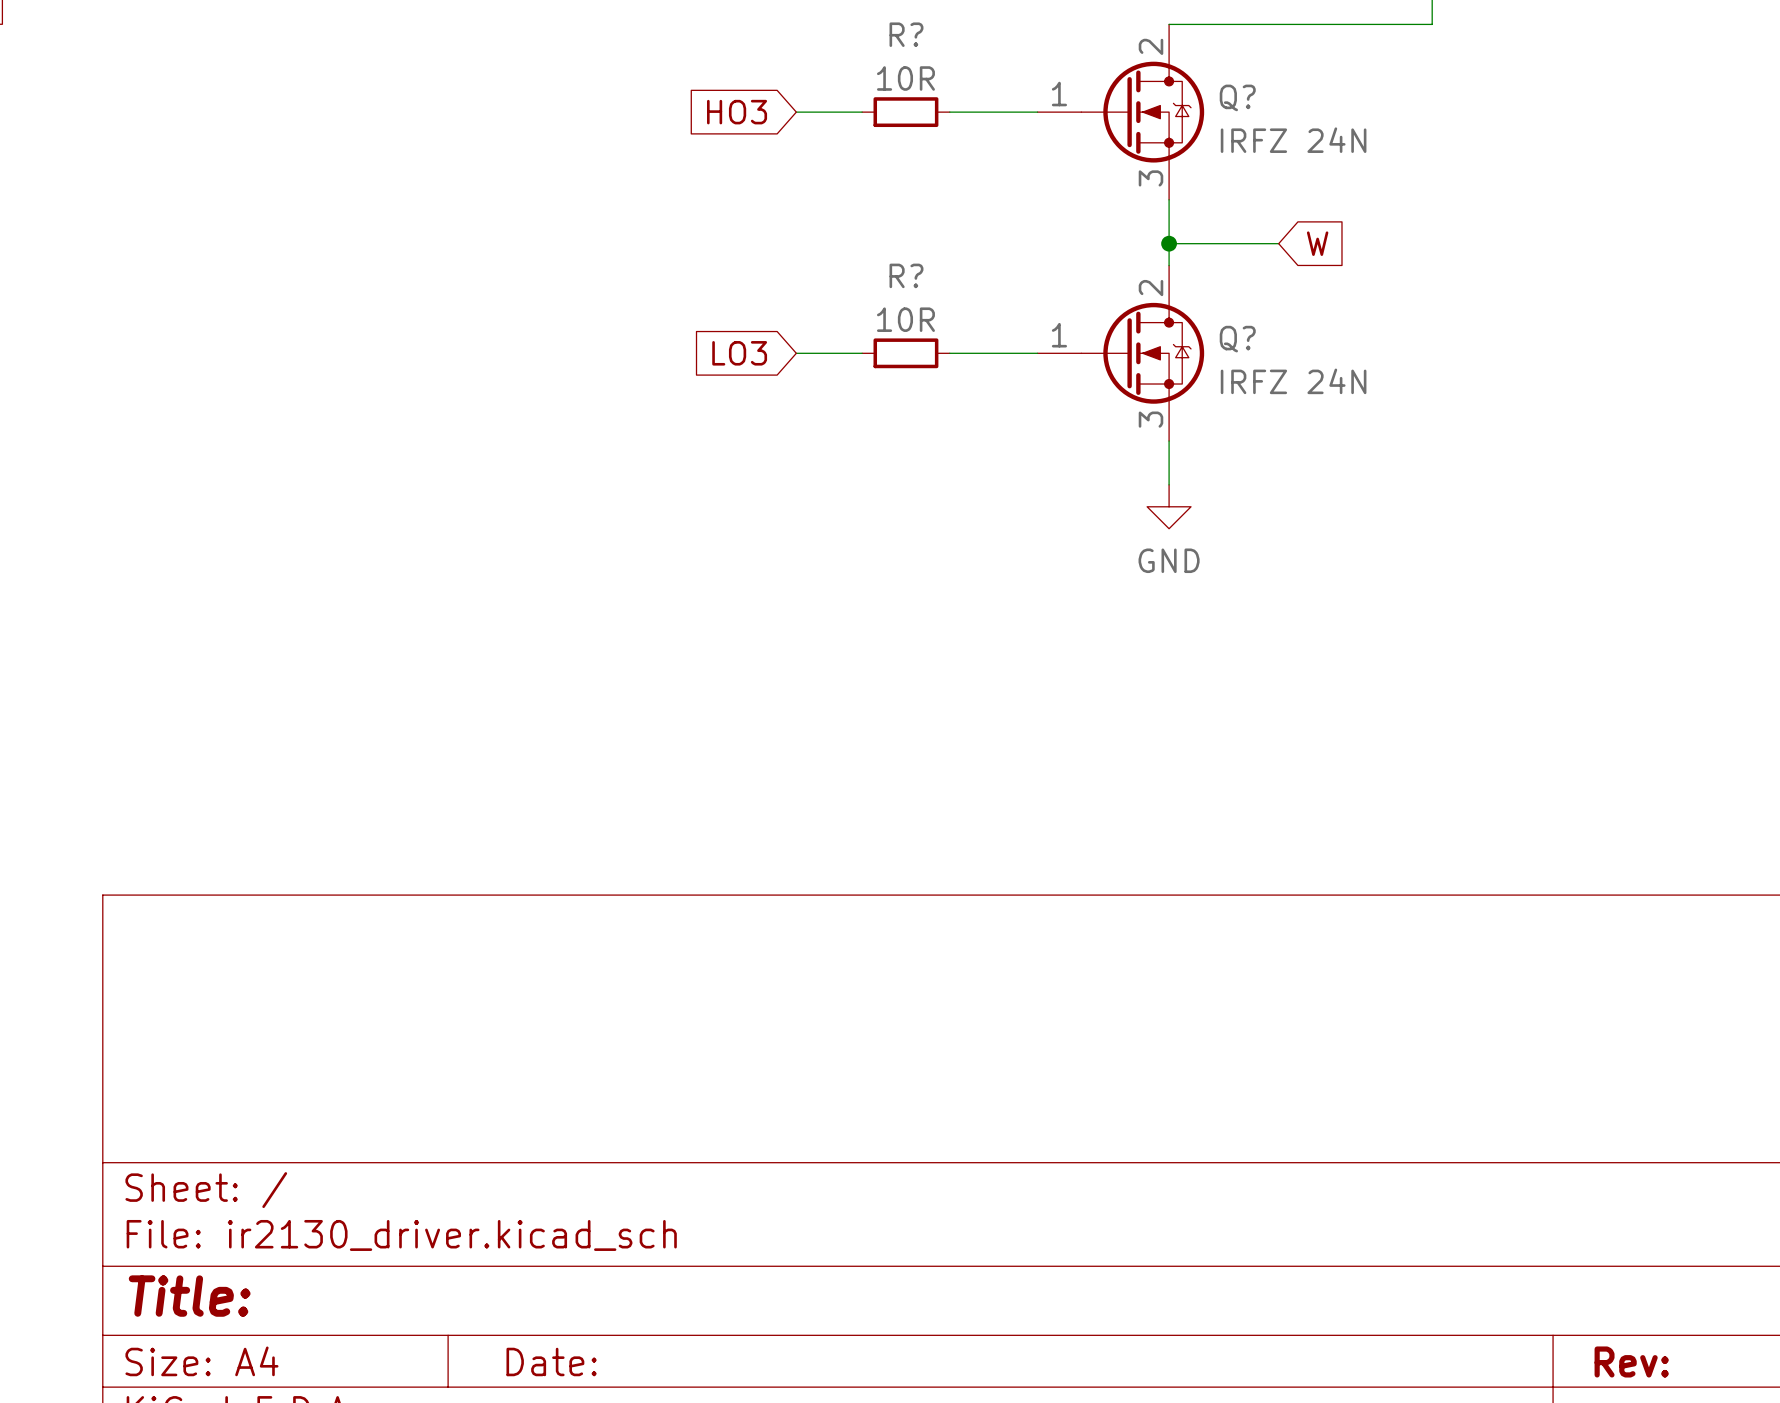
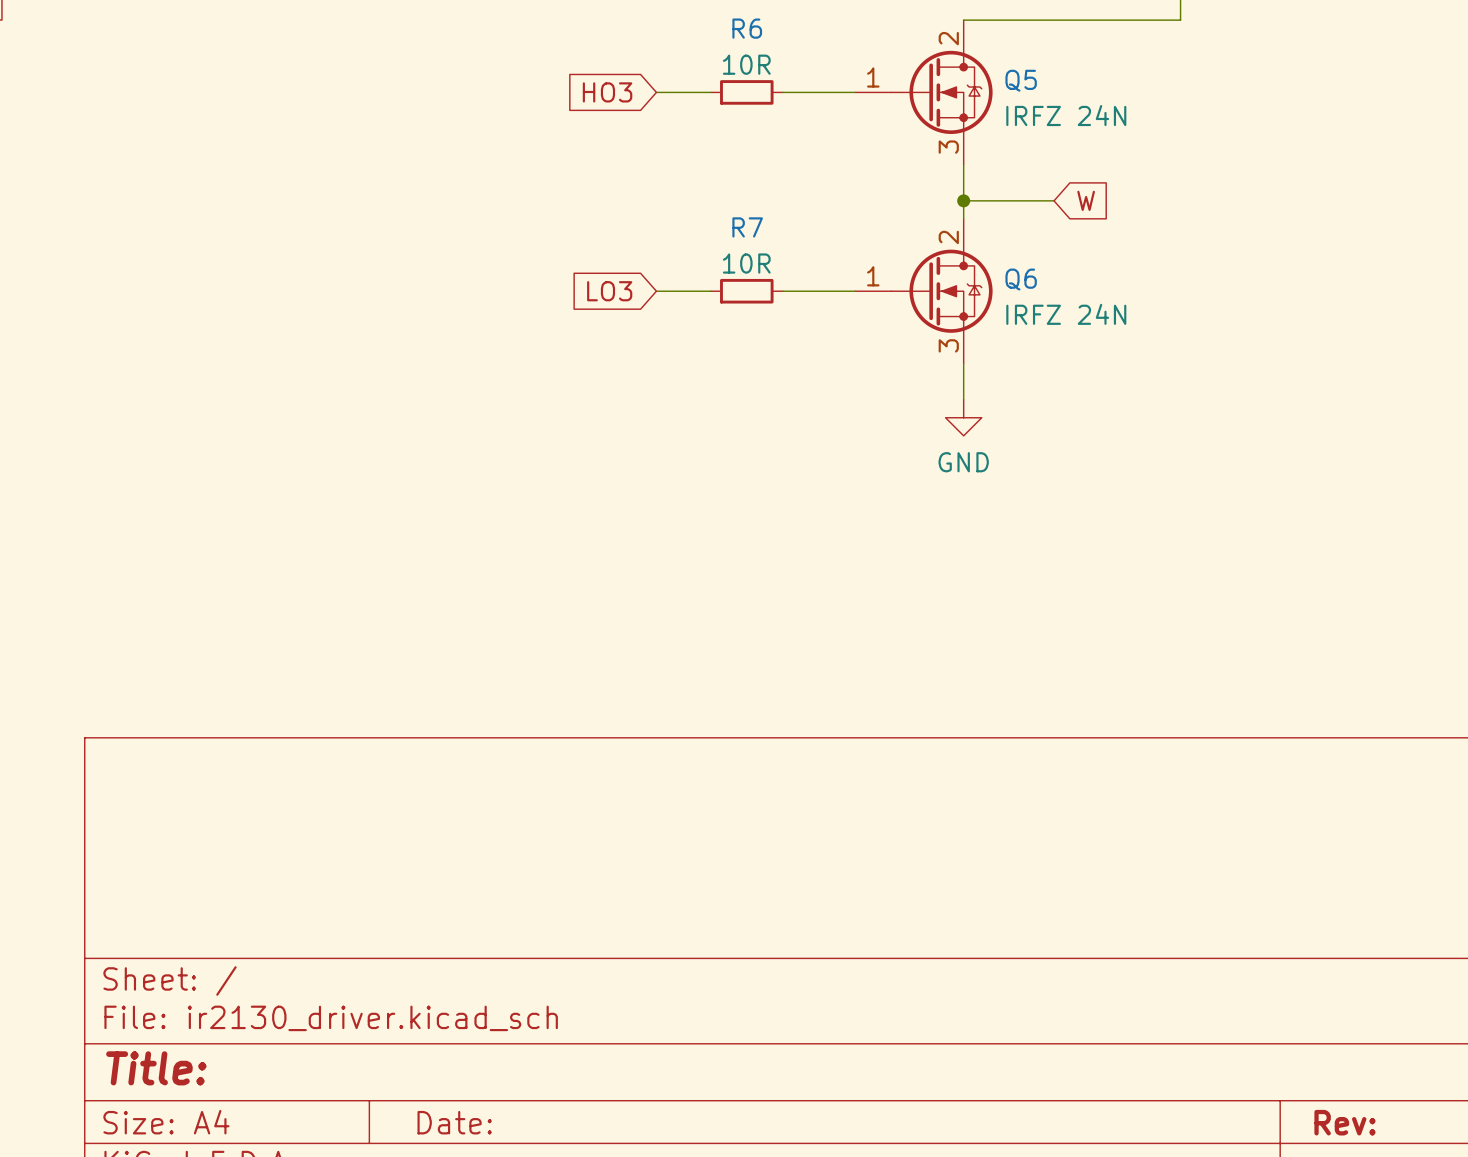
R? name: R? (906, 34) -> R6 (747, 28)
Q? name: Q? (1237, 97) -> Q5 (1021, 80)
R? name: R? (906, 275) -> R7 (747, 227)
Q? name: Q? (1237, 339) -> Q6 (1021, 279)

